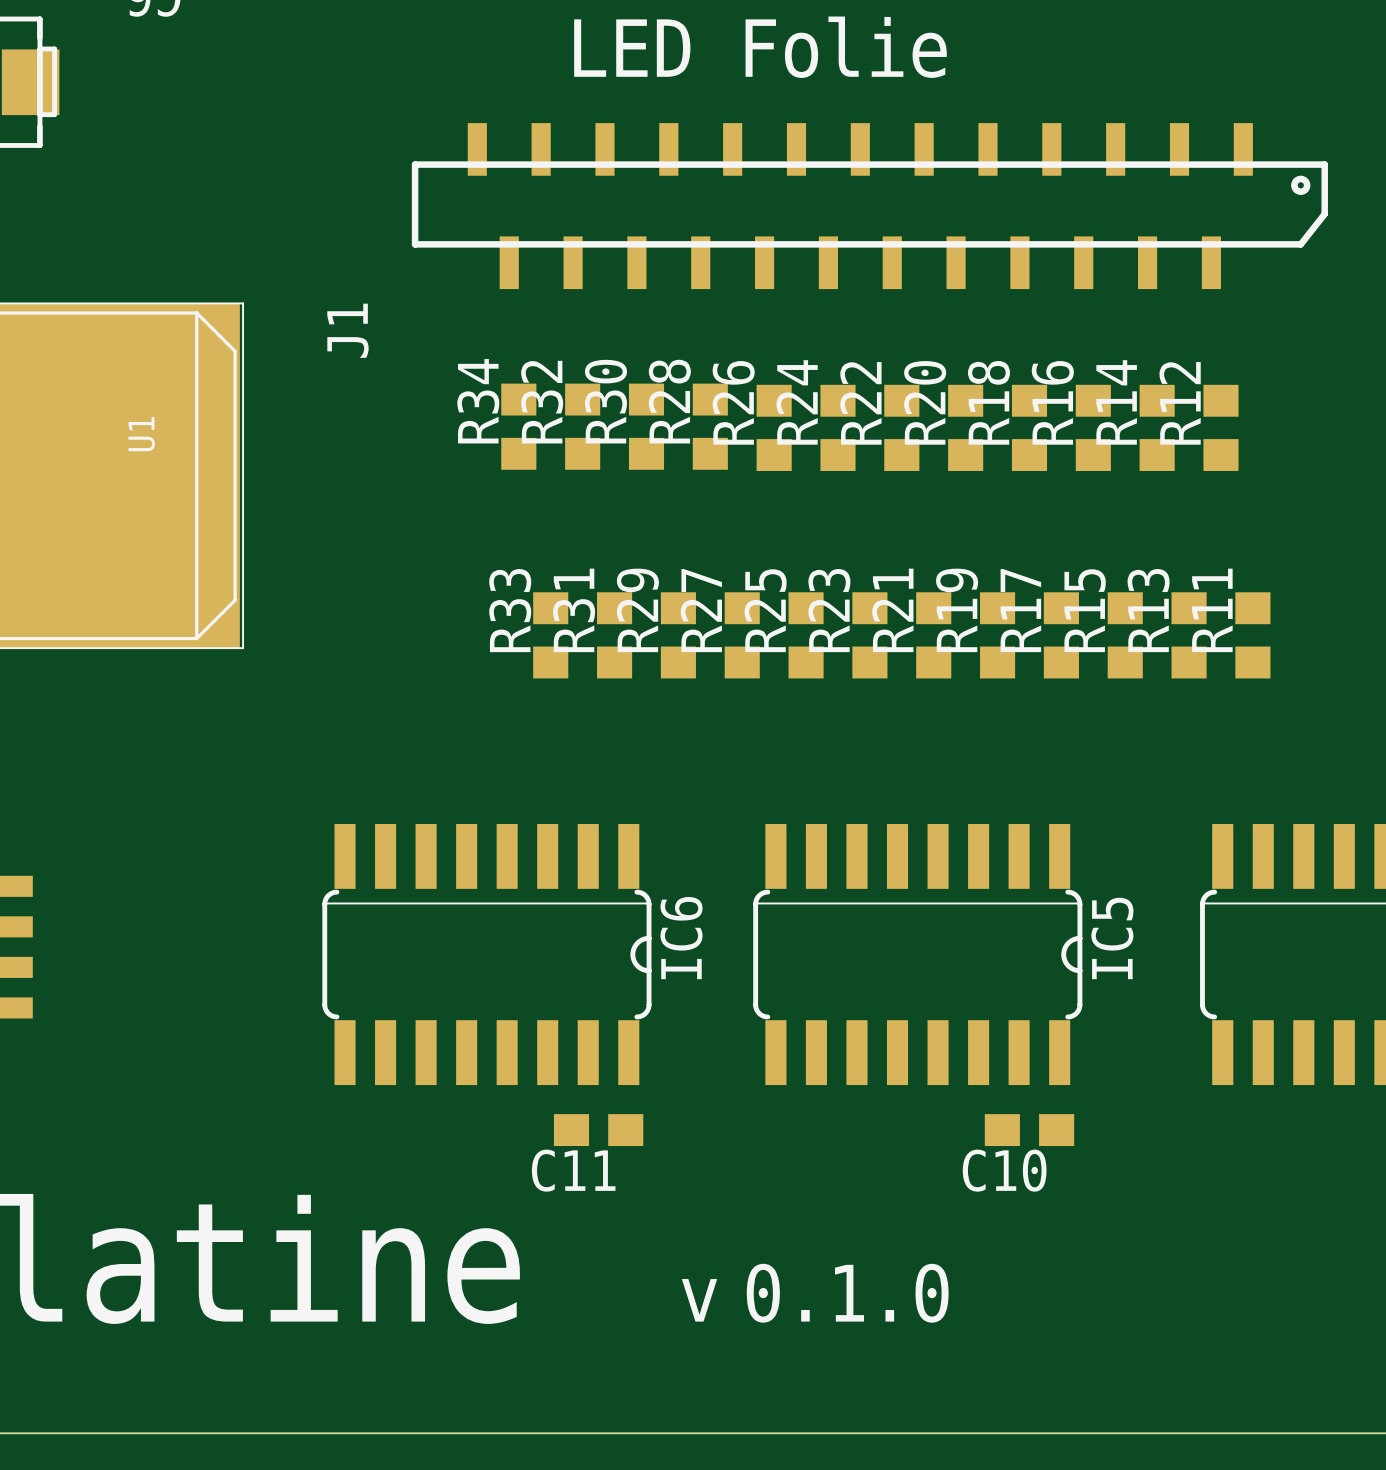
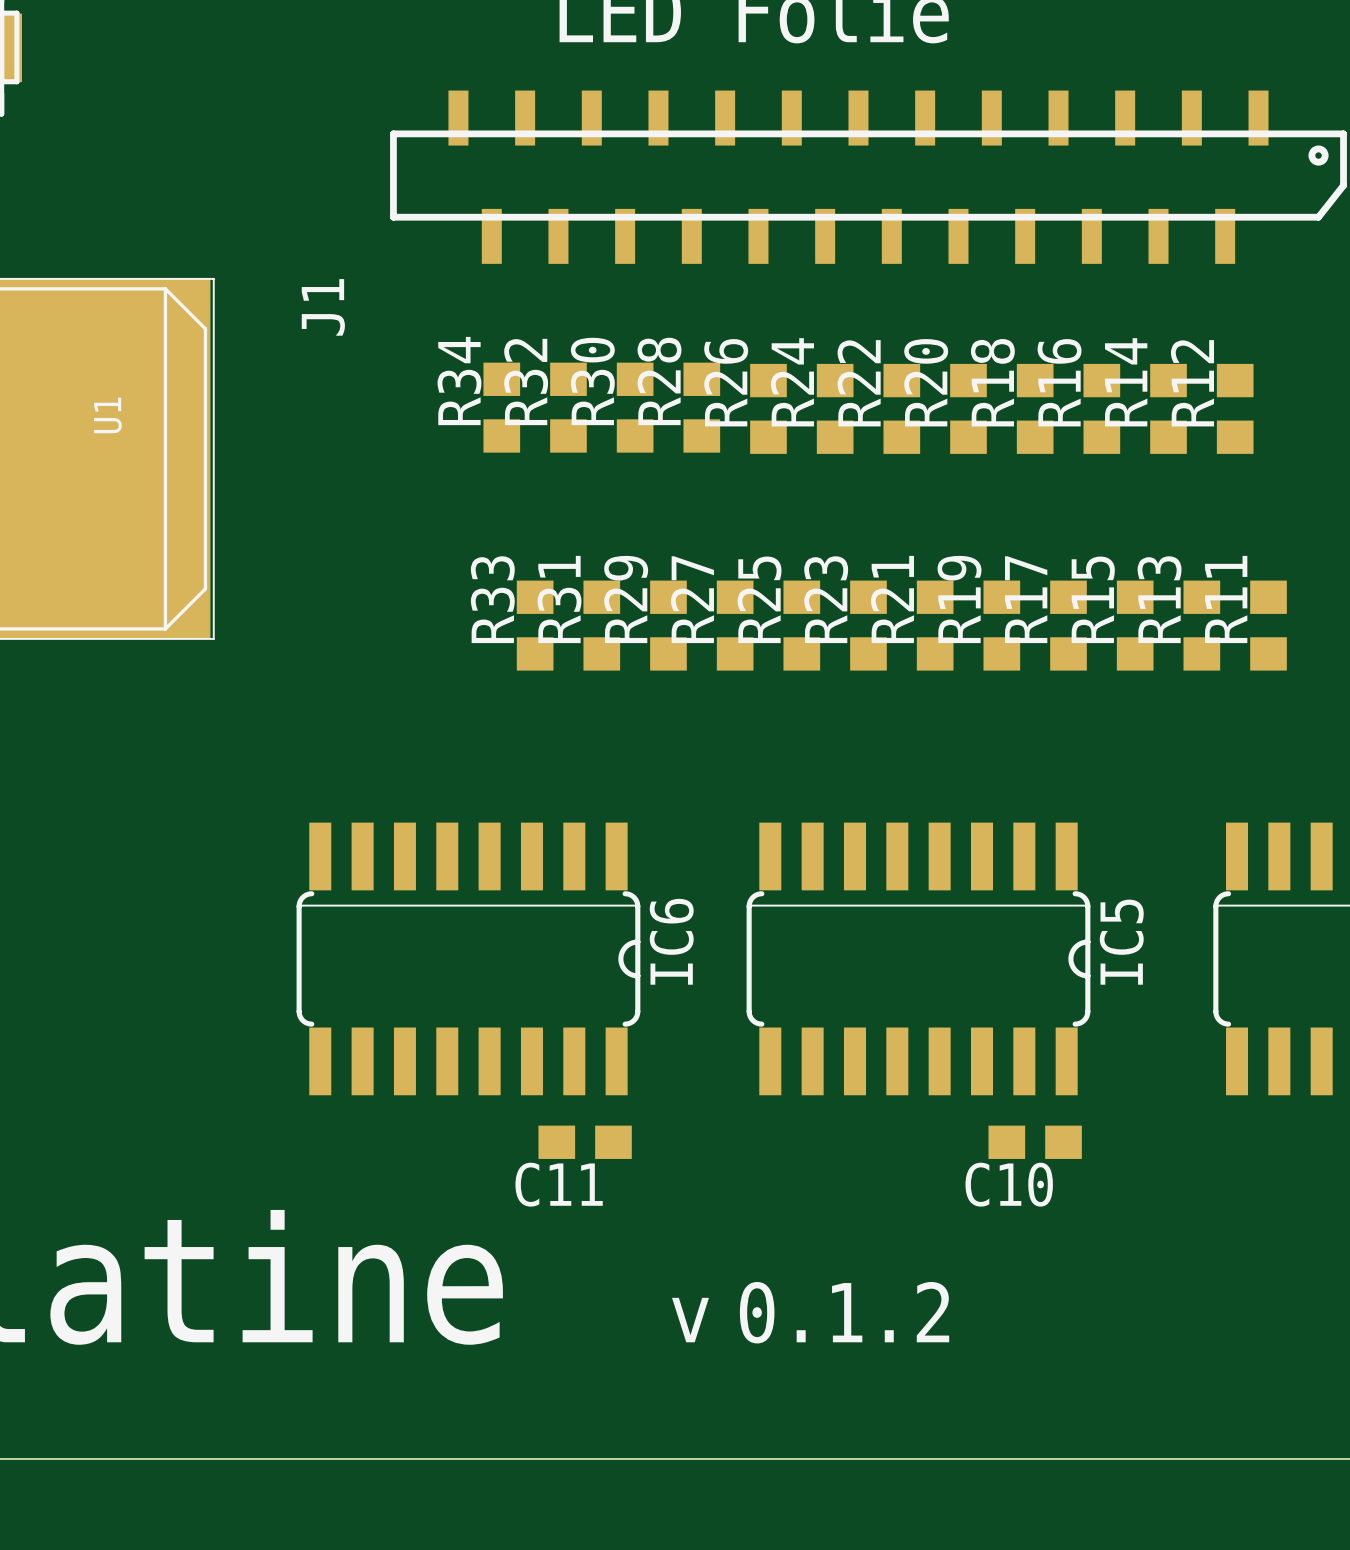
text: 0.1.0 (847, 1293) -> 0.1.2 (844, 1312)

